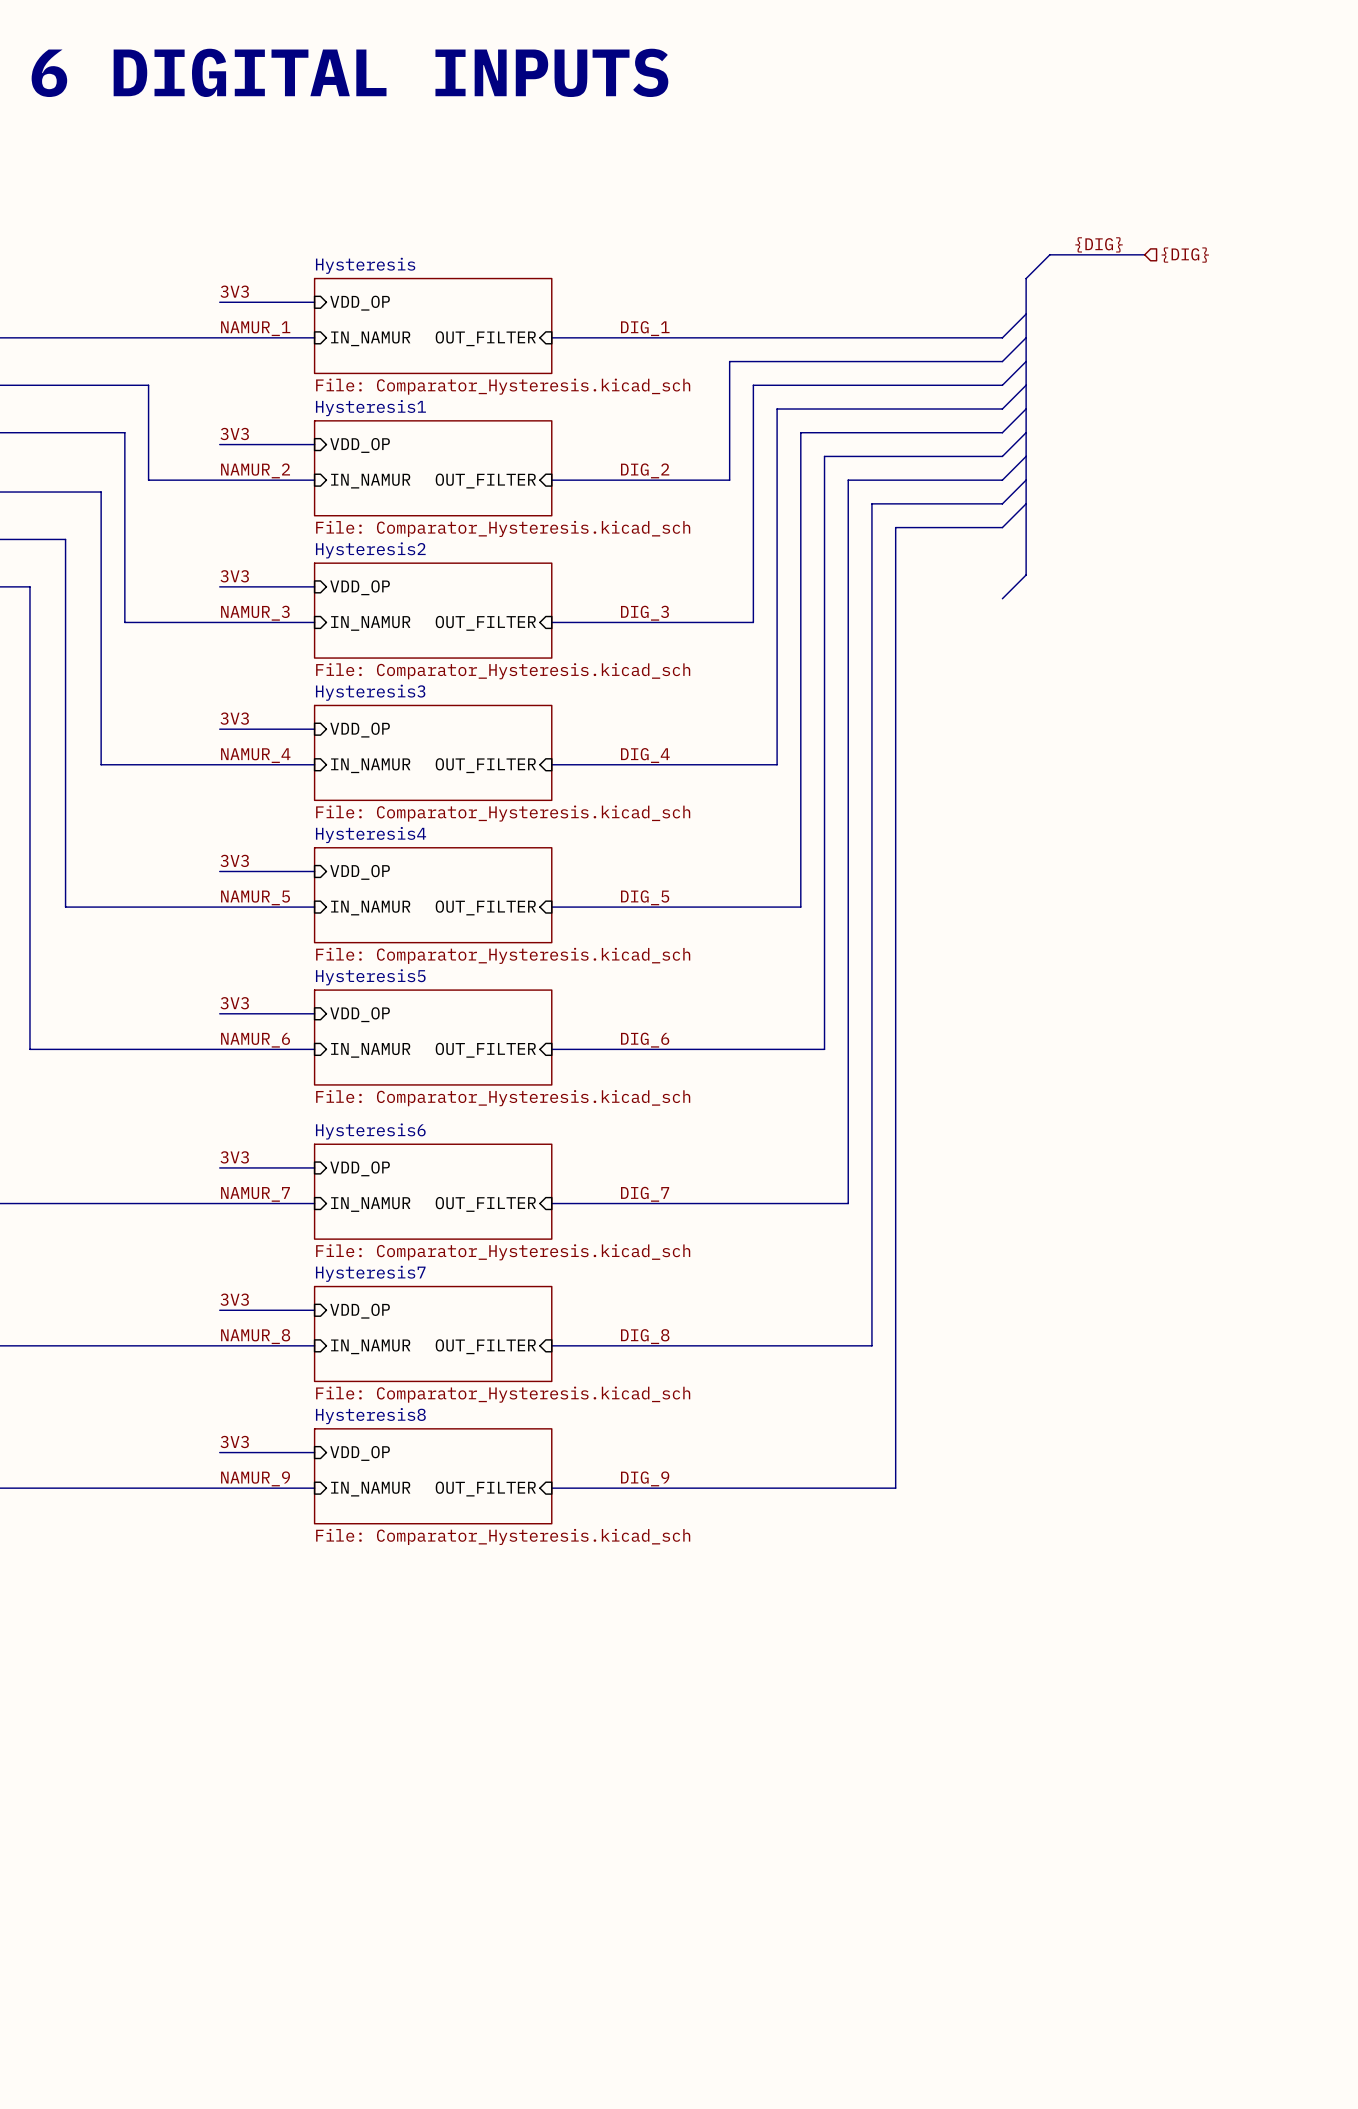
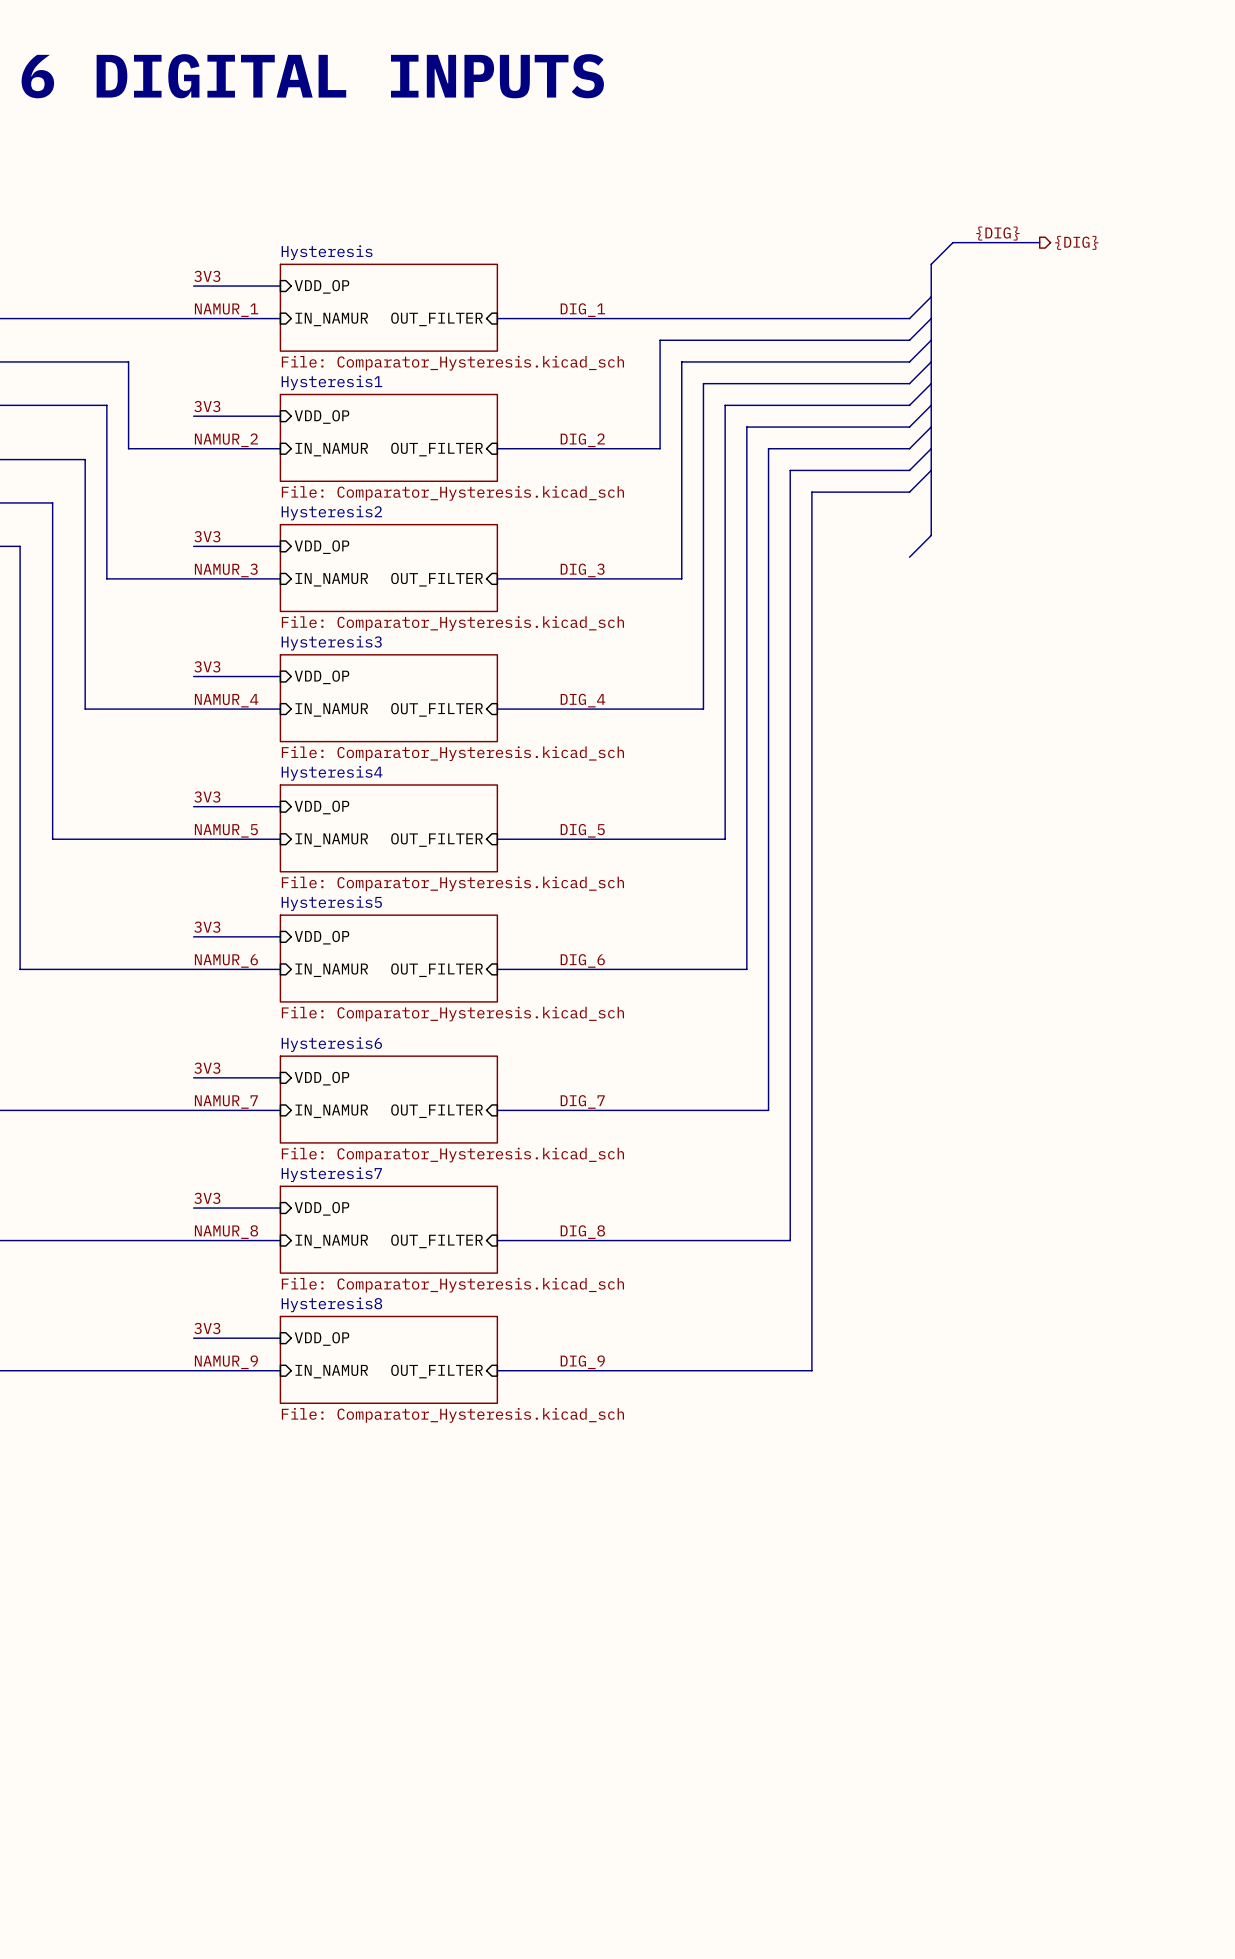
hierarchical label shape: input (1185, 255) -> output (1076, 242)

